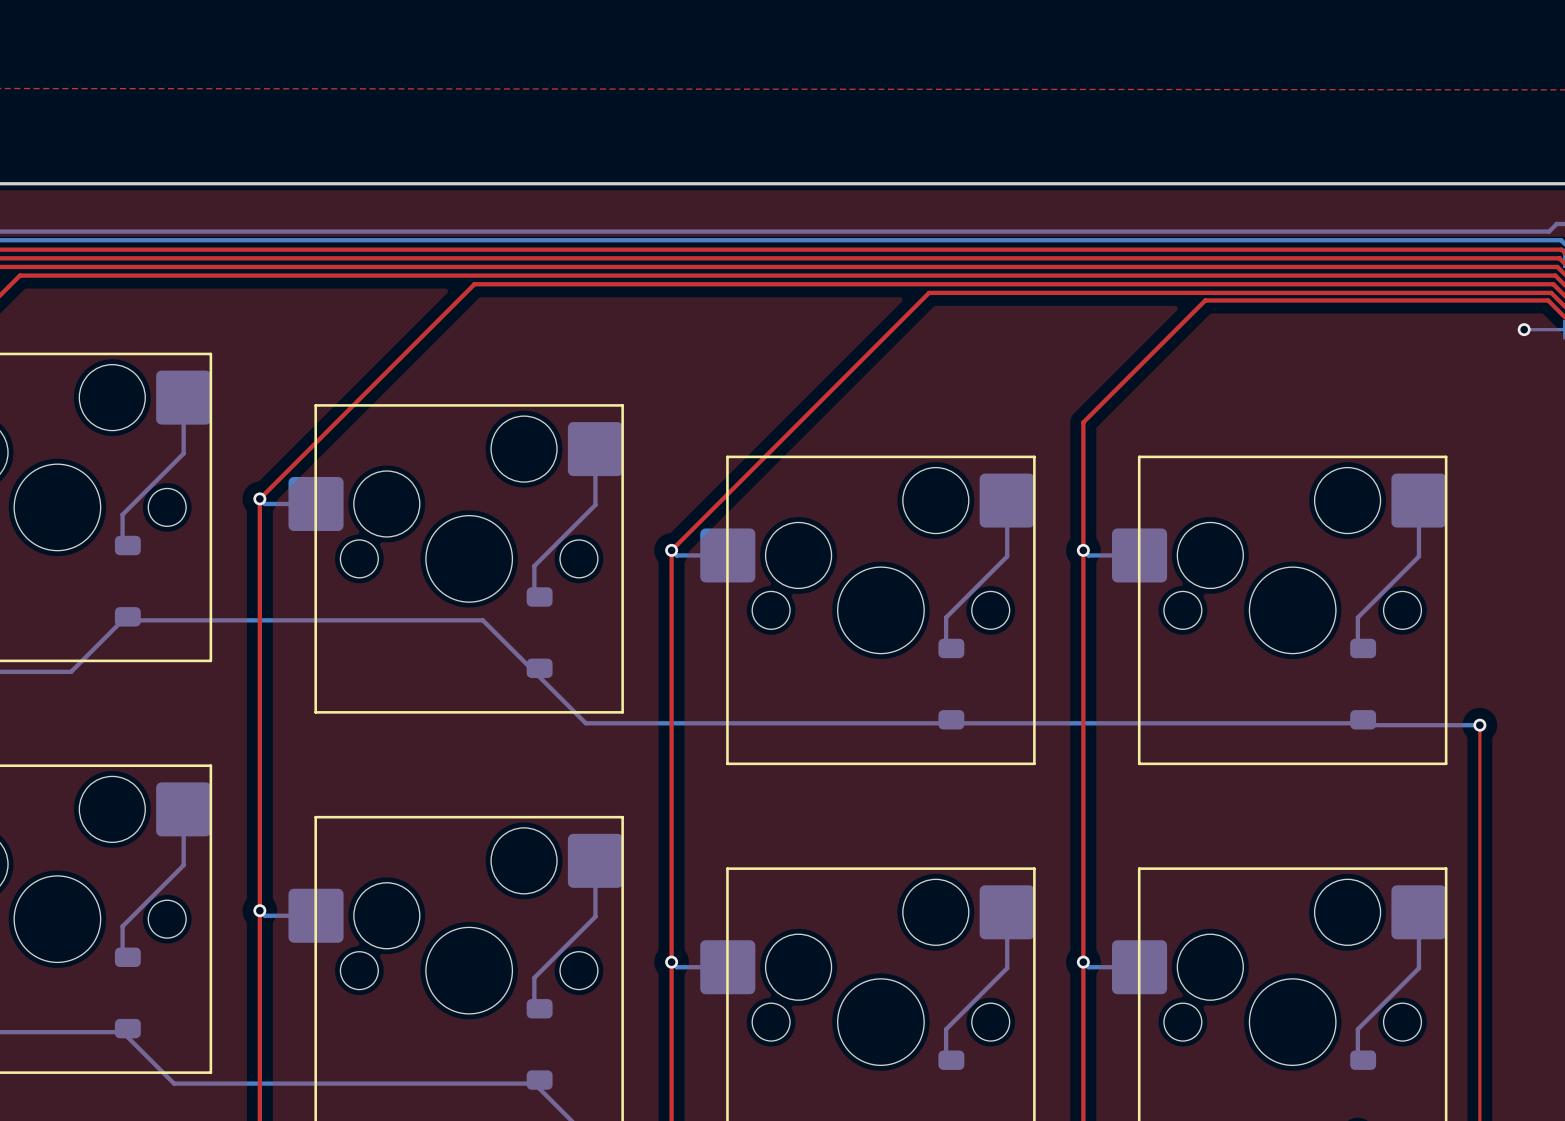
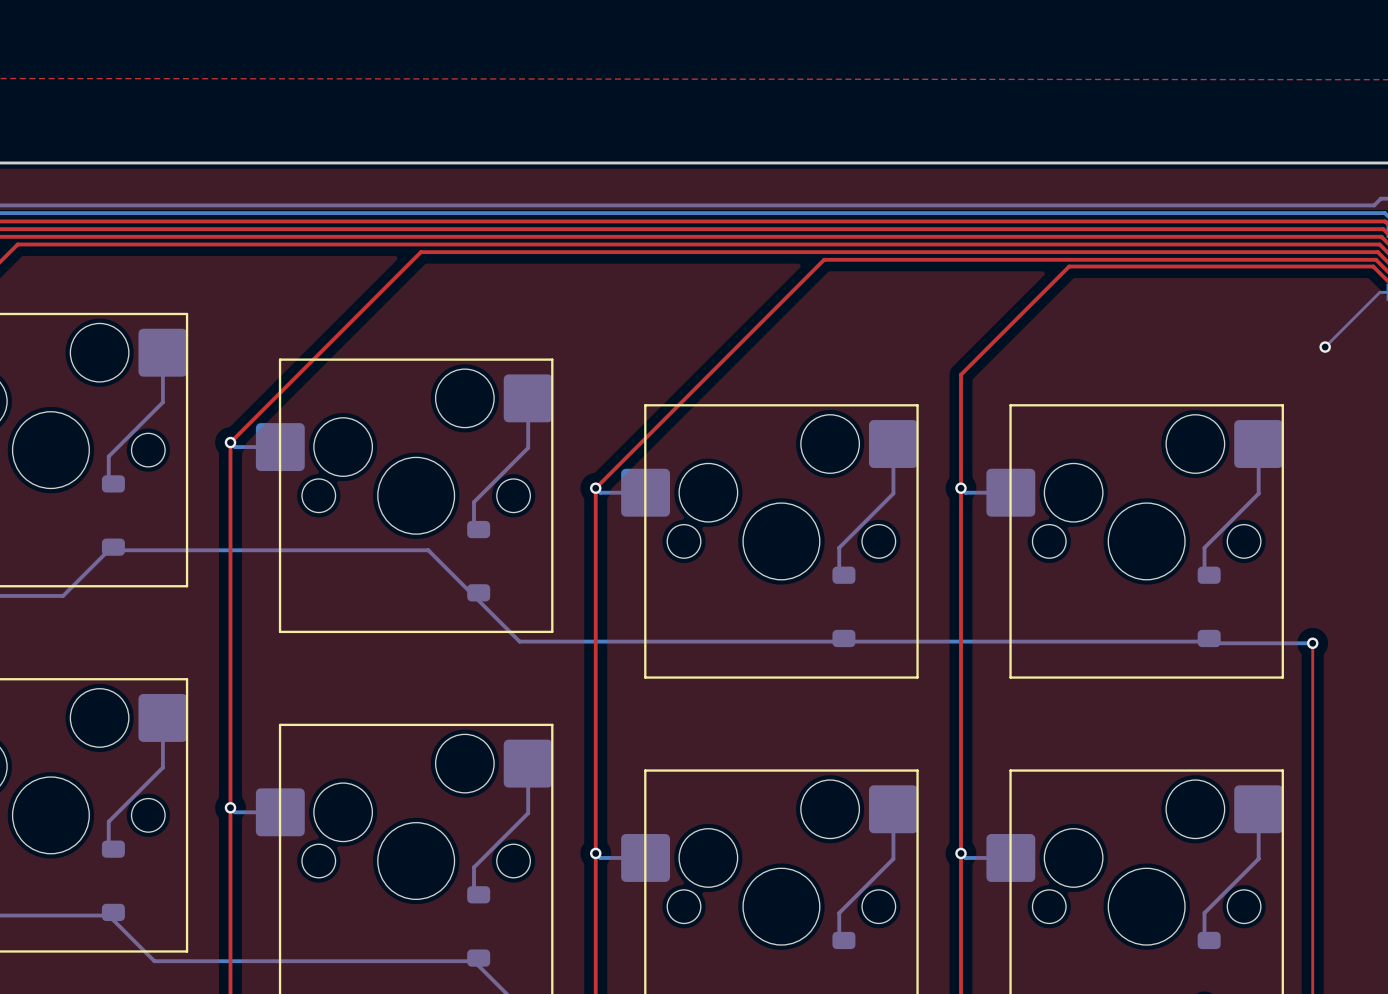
bottom track: (1524, 329) (1555, 329) -> (1325, 347) (1379, 292)
via position: (1524, 329) -> (1325, 347)

